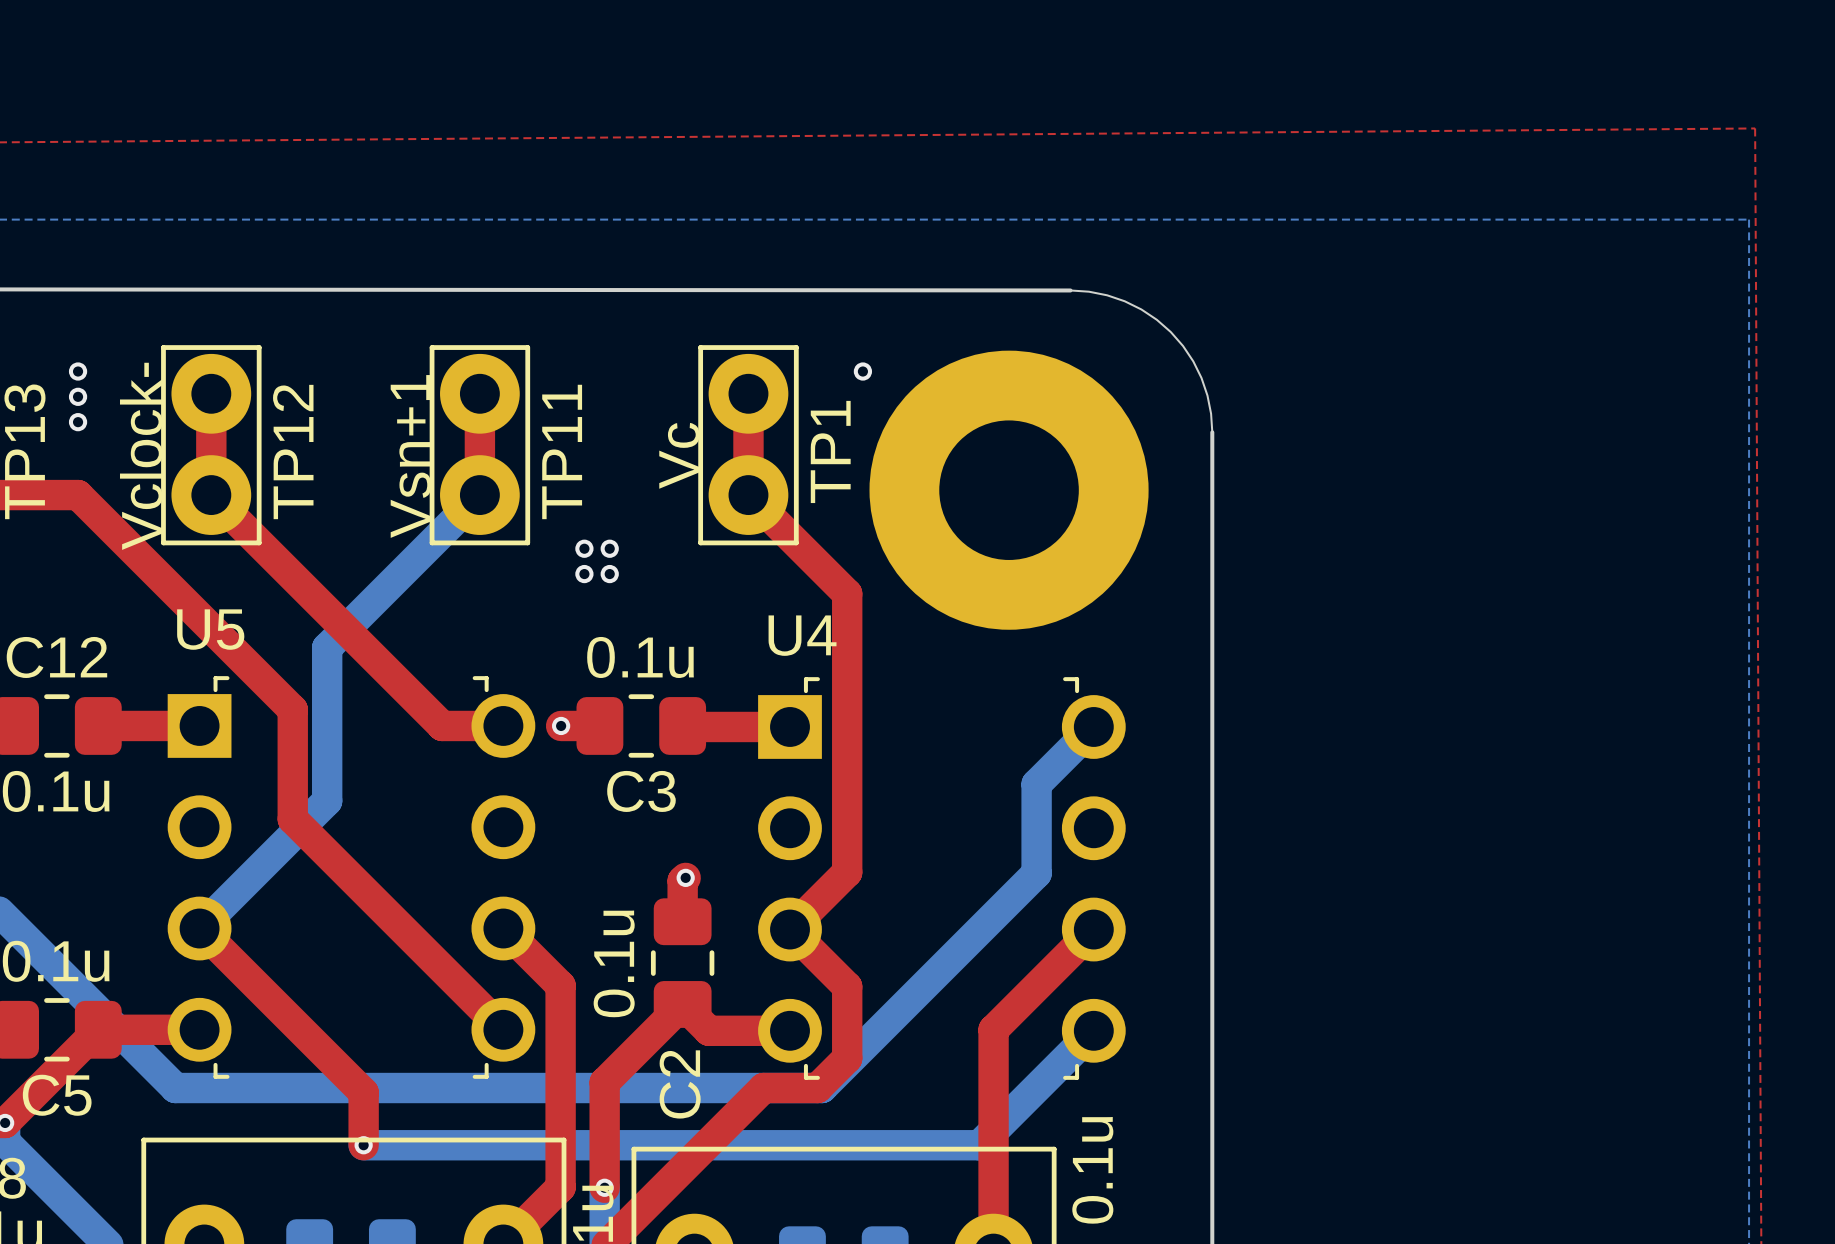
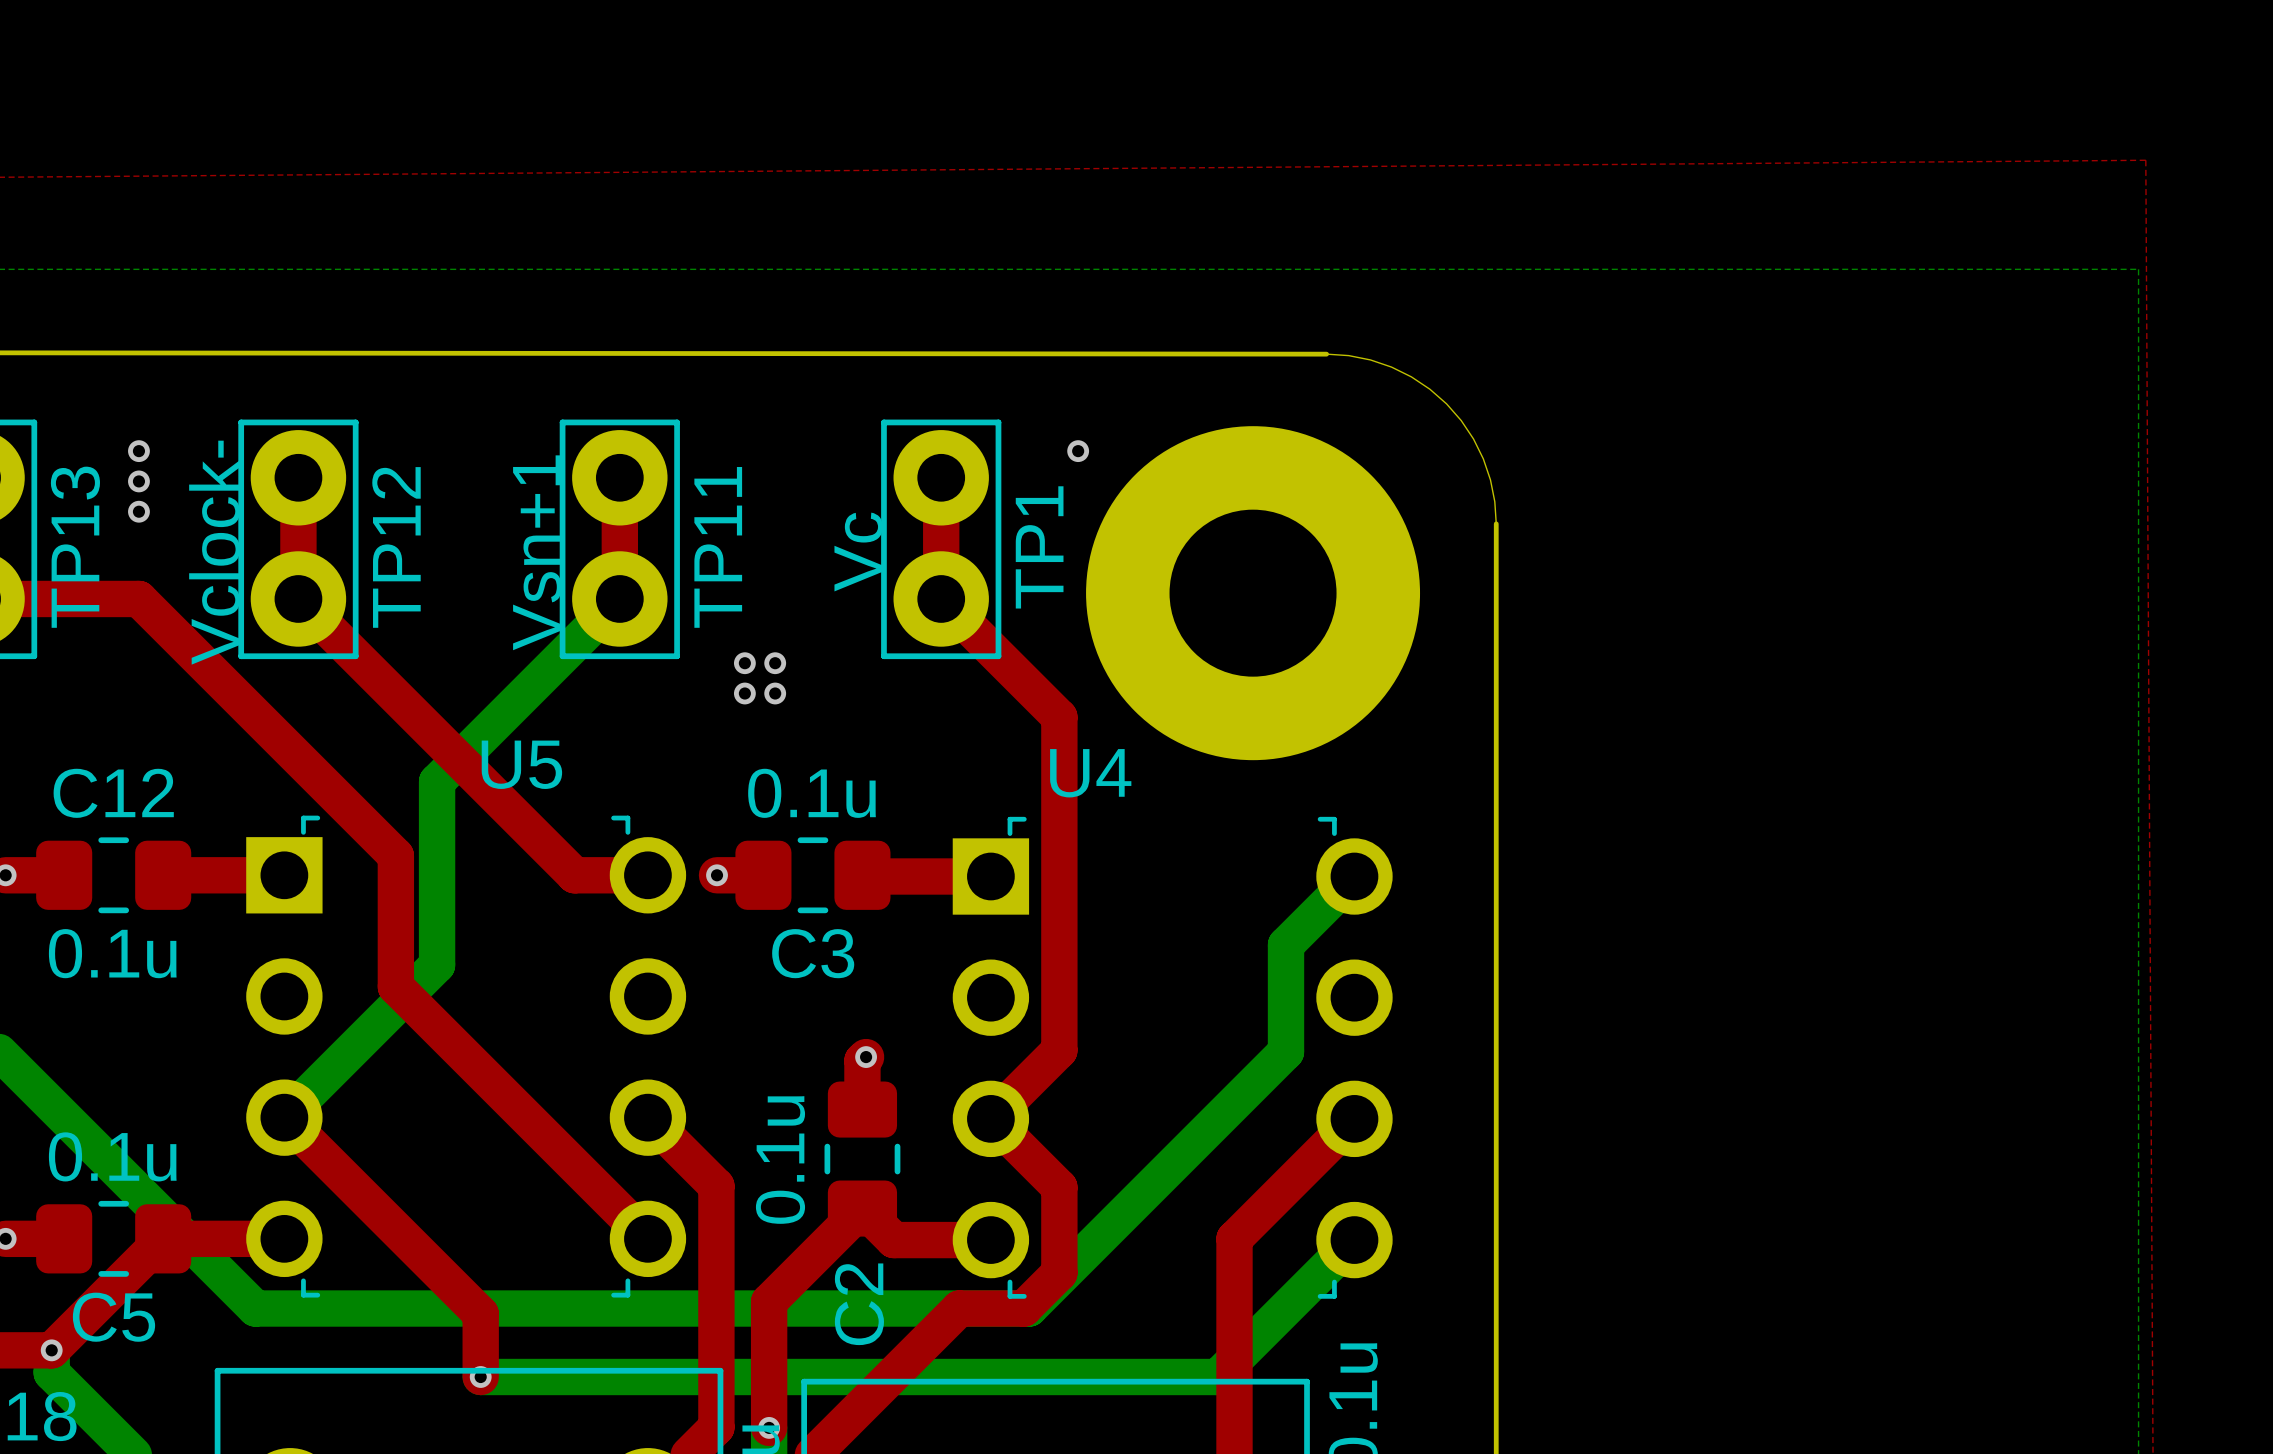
U5 name position: U5 (210, 629) -> U5 (521, 764)
U4 name position: U4 (802, 635) -> U4 (1090, 773)

